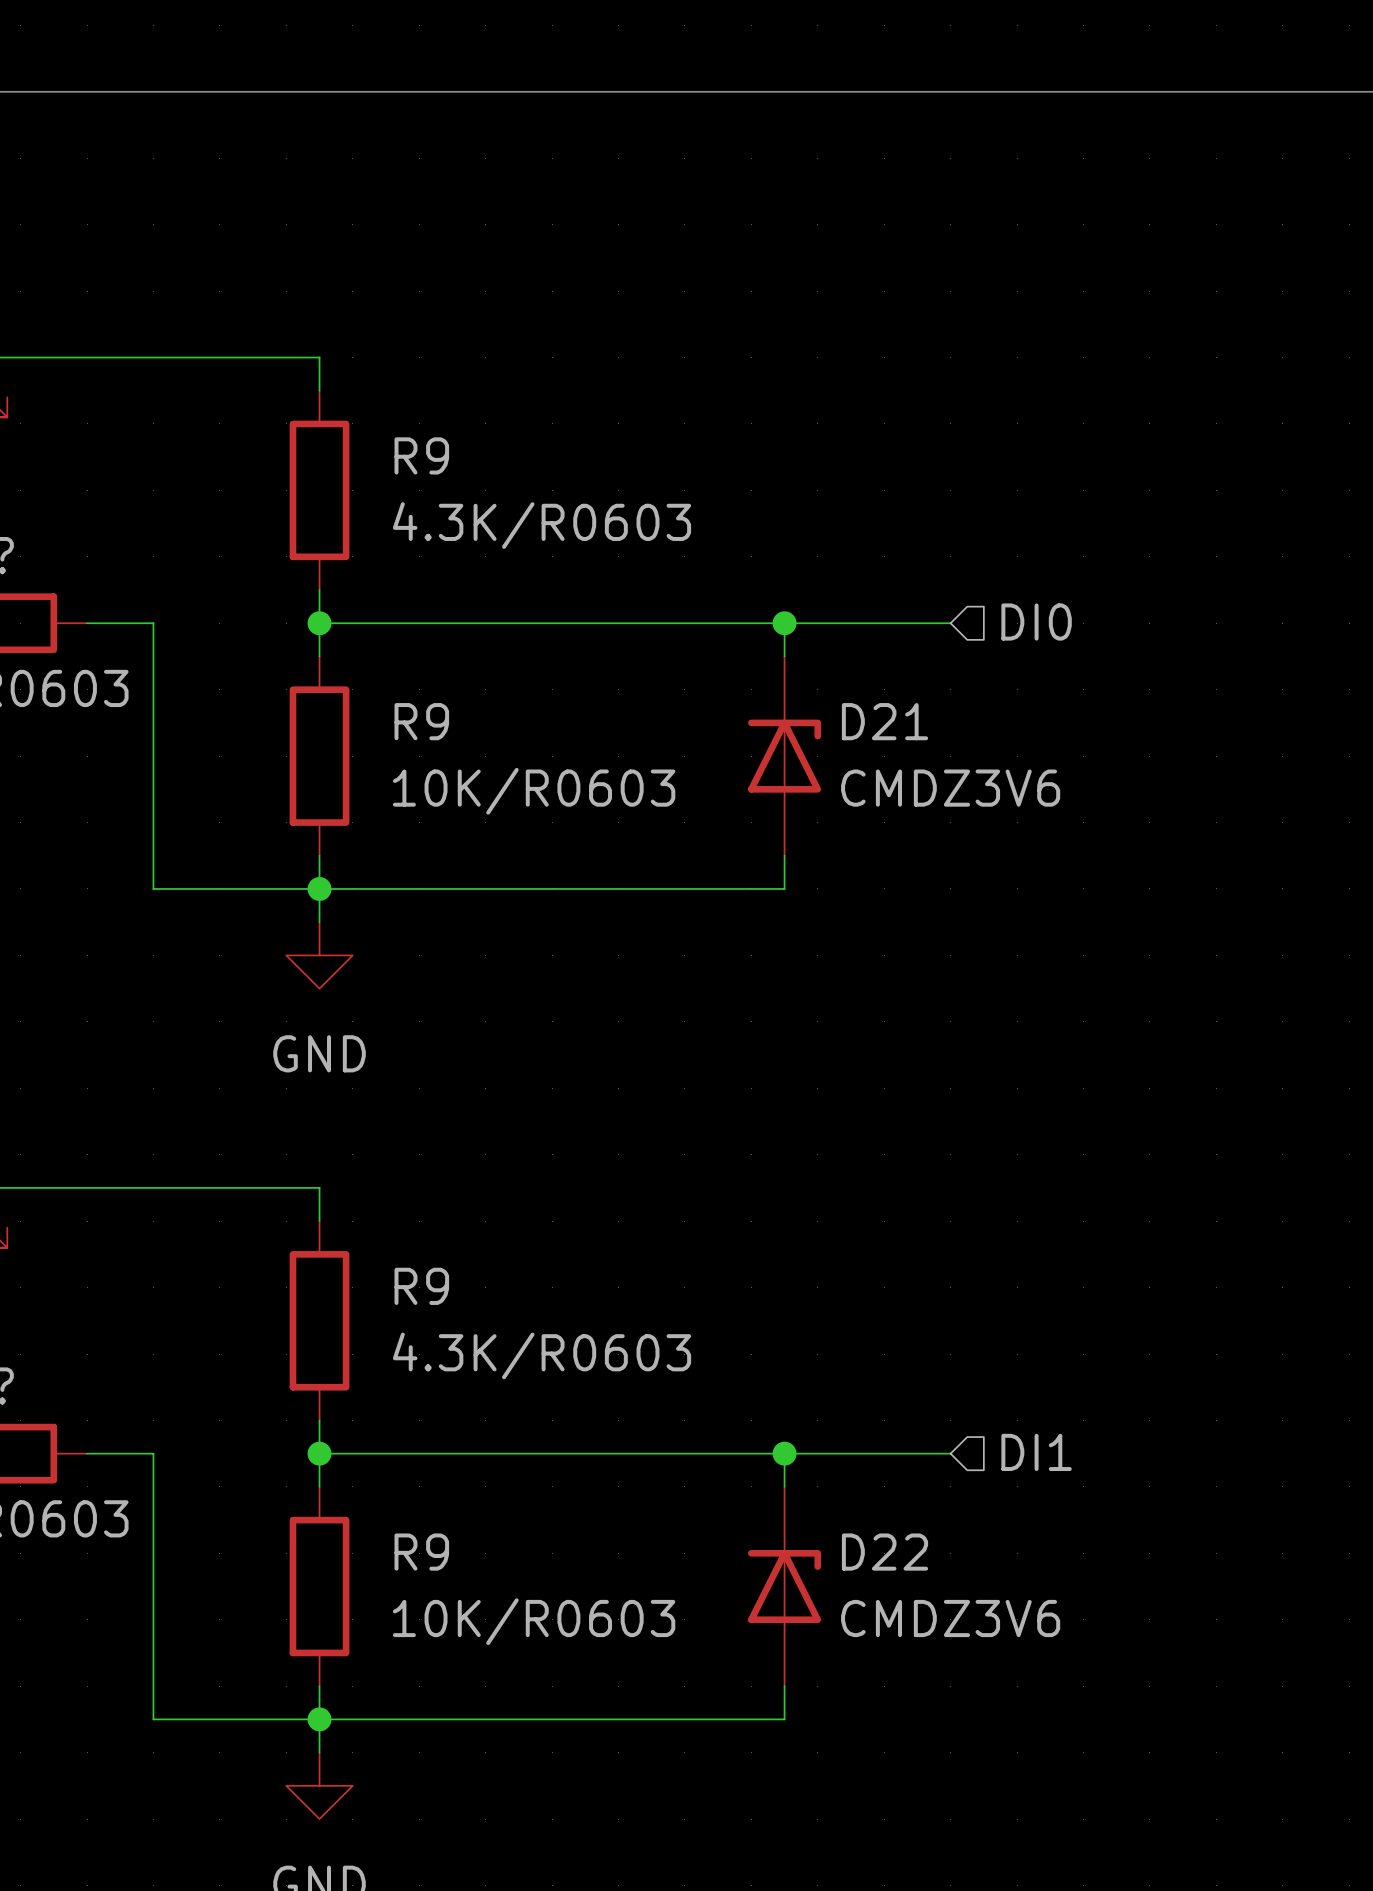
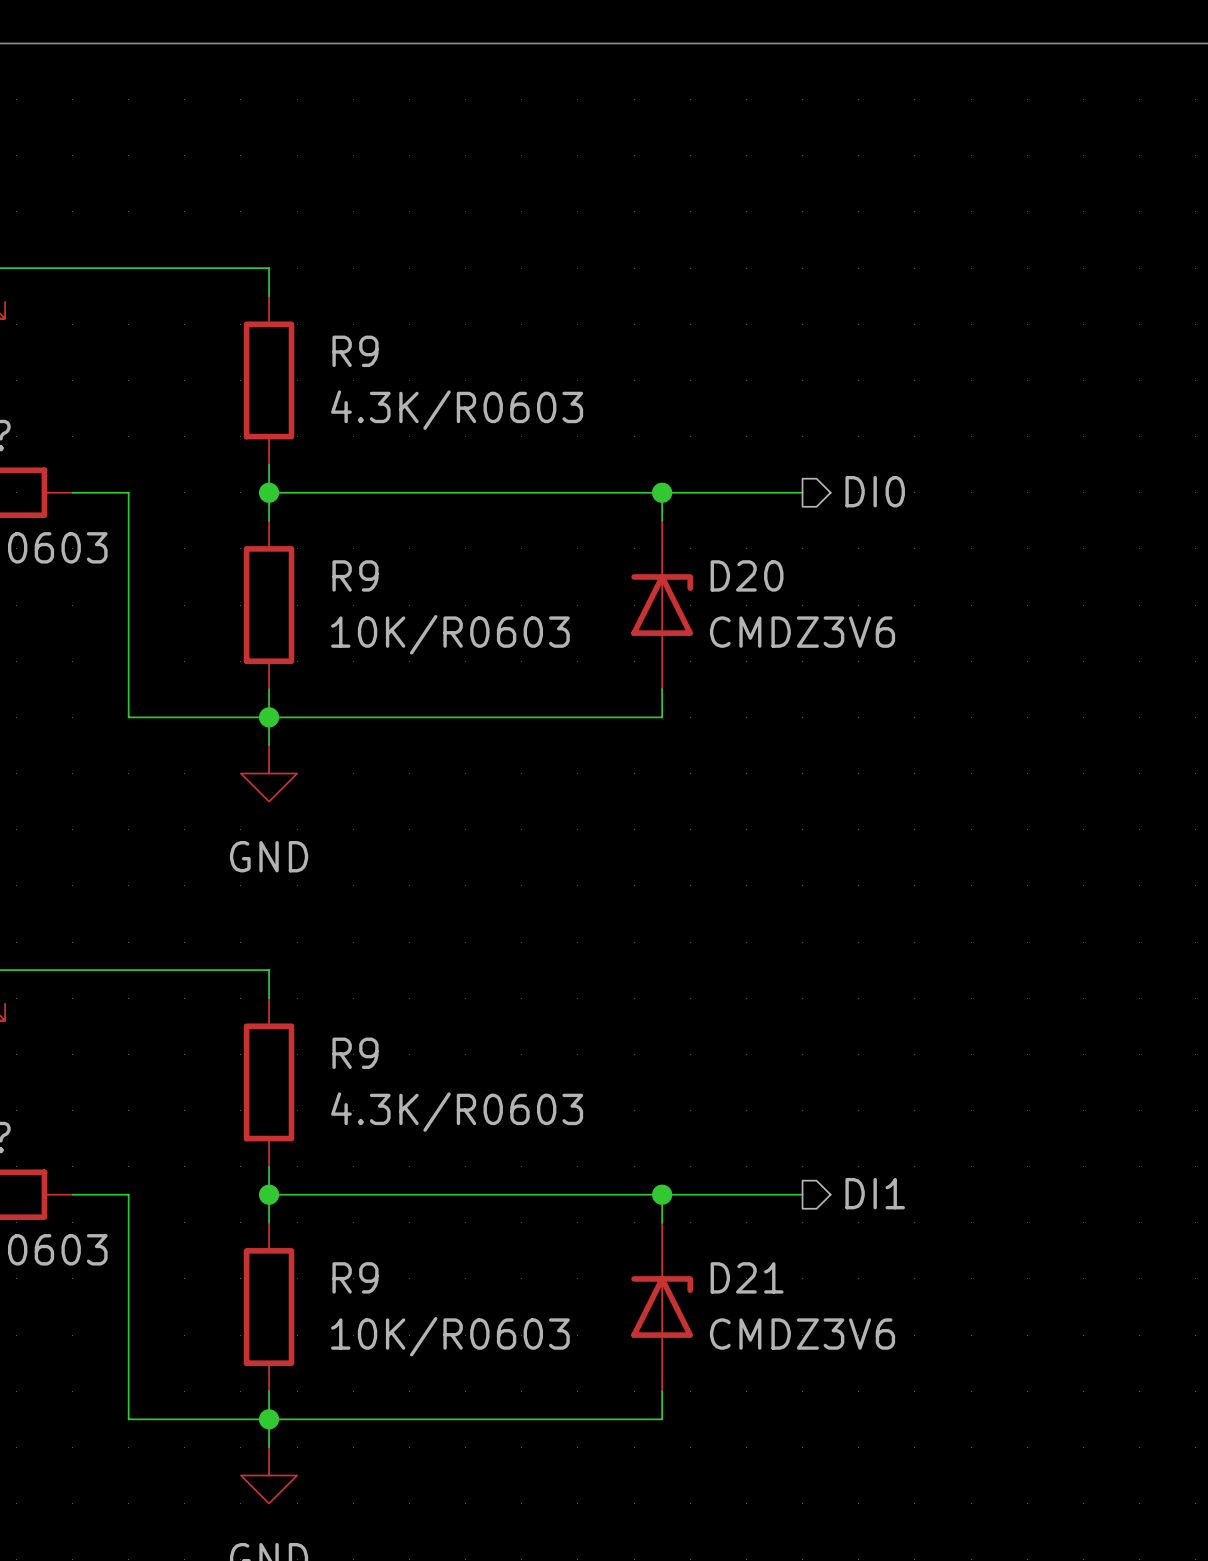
hierarchical label shape: input (1036, 622) -> output (875, 491)
D21 name: D21 (884, 721) -> D20 (747, 575)
hierarchical label shape: input (1036, 1452) -> output (875, 1193)
D22 name: D22 (884, 1552) -> D21 (747, 1277)

